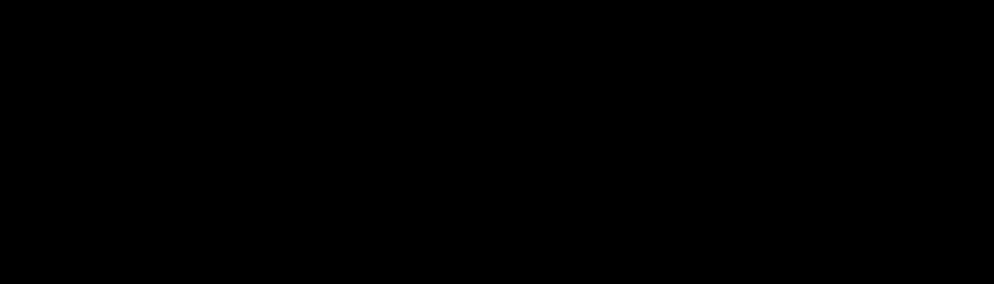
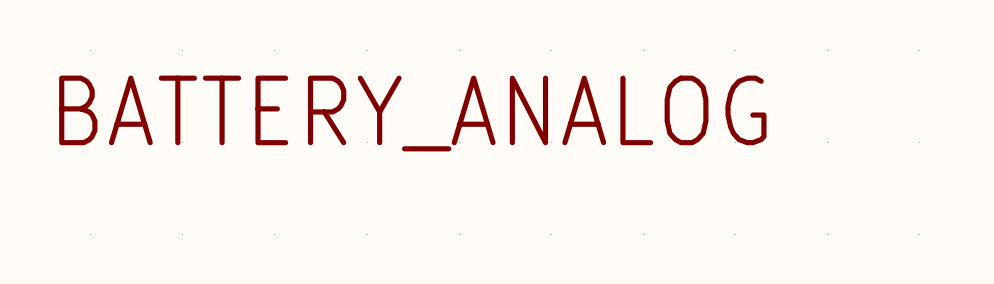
label: none -> BATTERY_ANALOG (412, 113)

